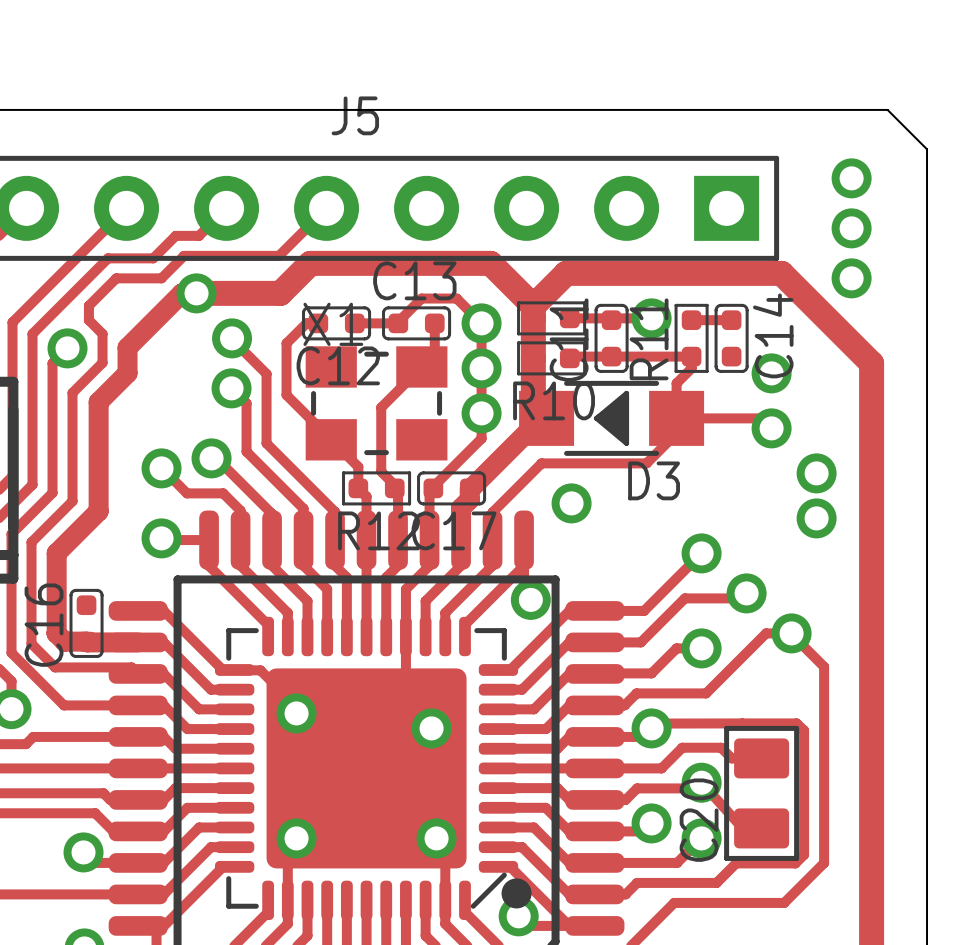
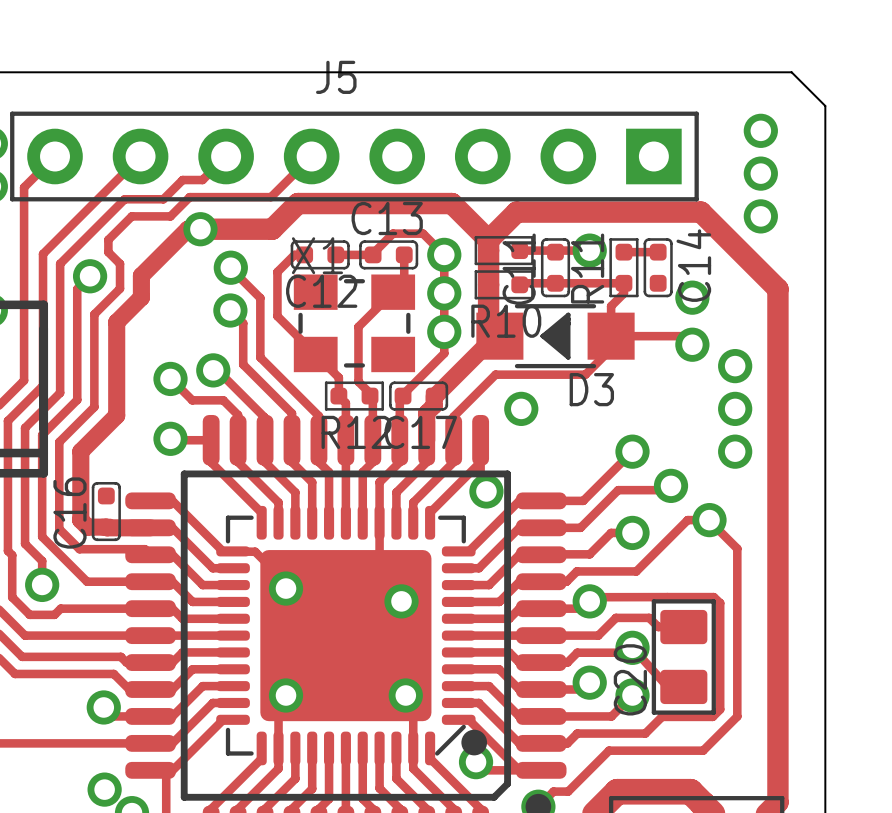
via: none -> (735, 366)
via: (816, 473) -> none
via: none -> (735, 408)
via: (816, 518) -> none
via: none -> (735, 451)

